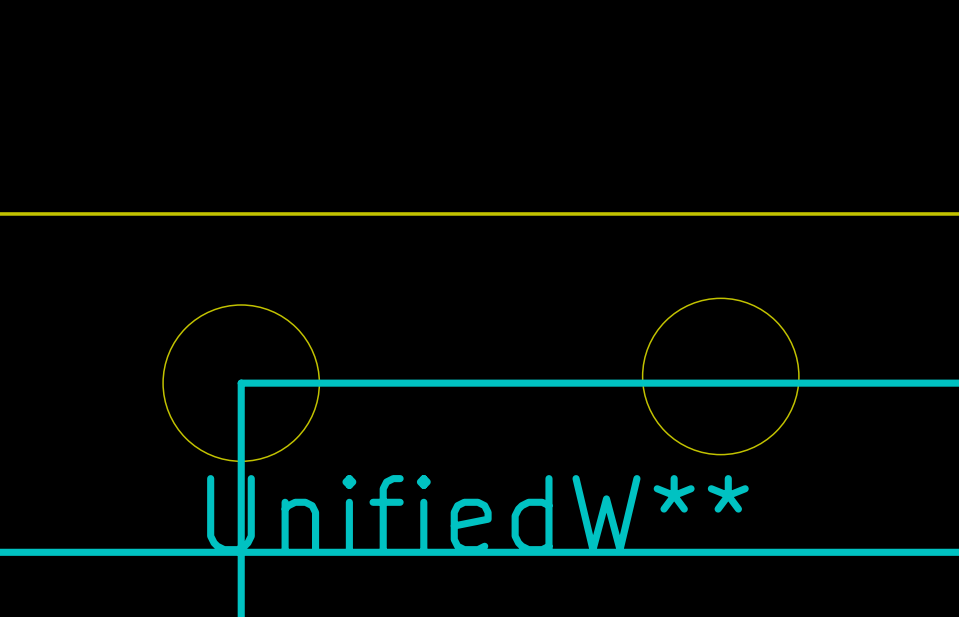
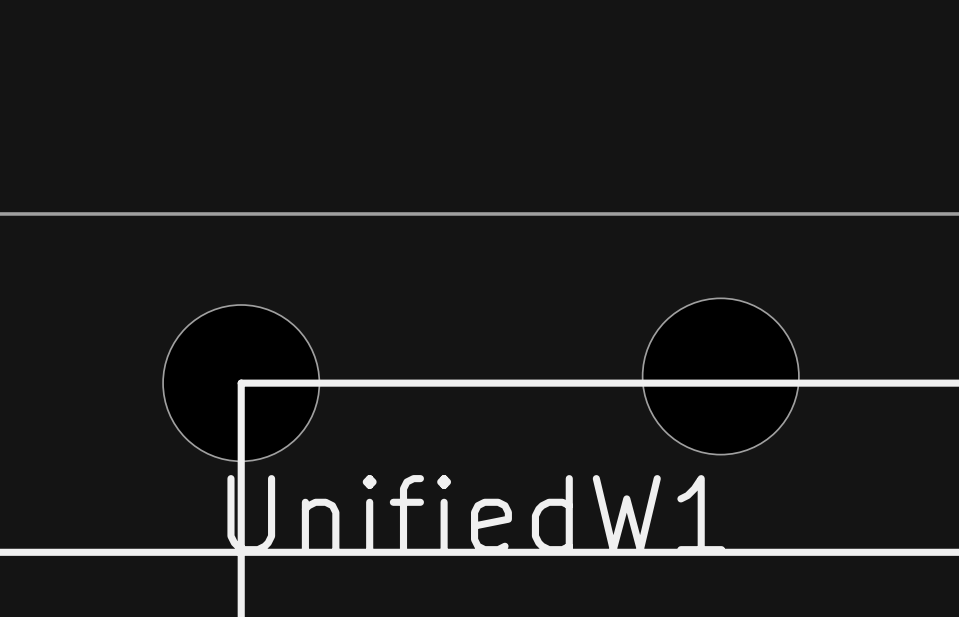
UnifiedW** name: UnifiedW** (477, 514) -> UnifiedW1 (476, 514)

